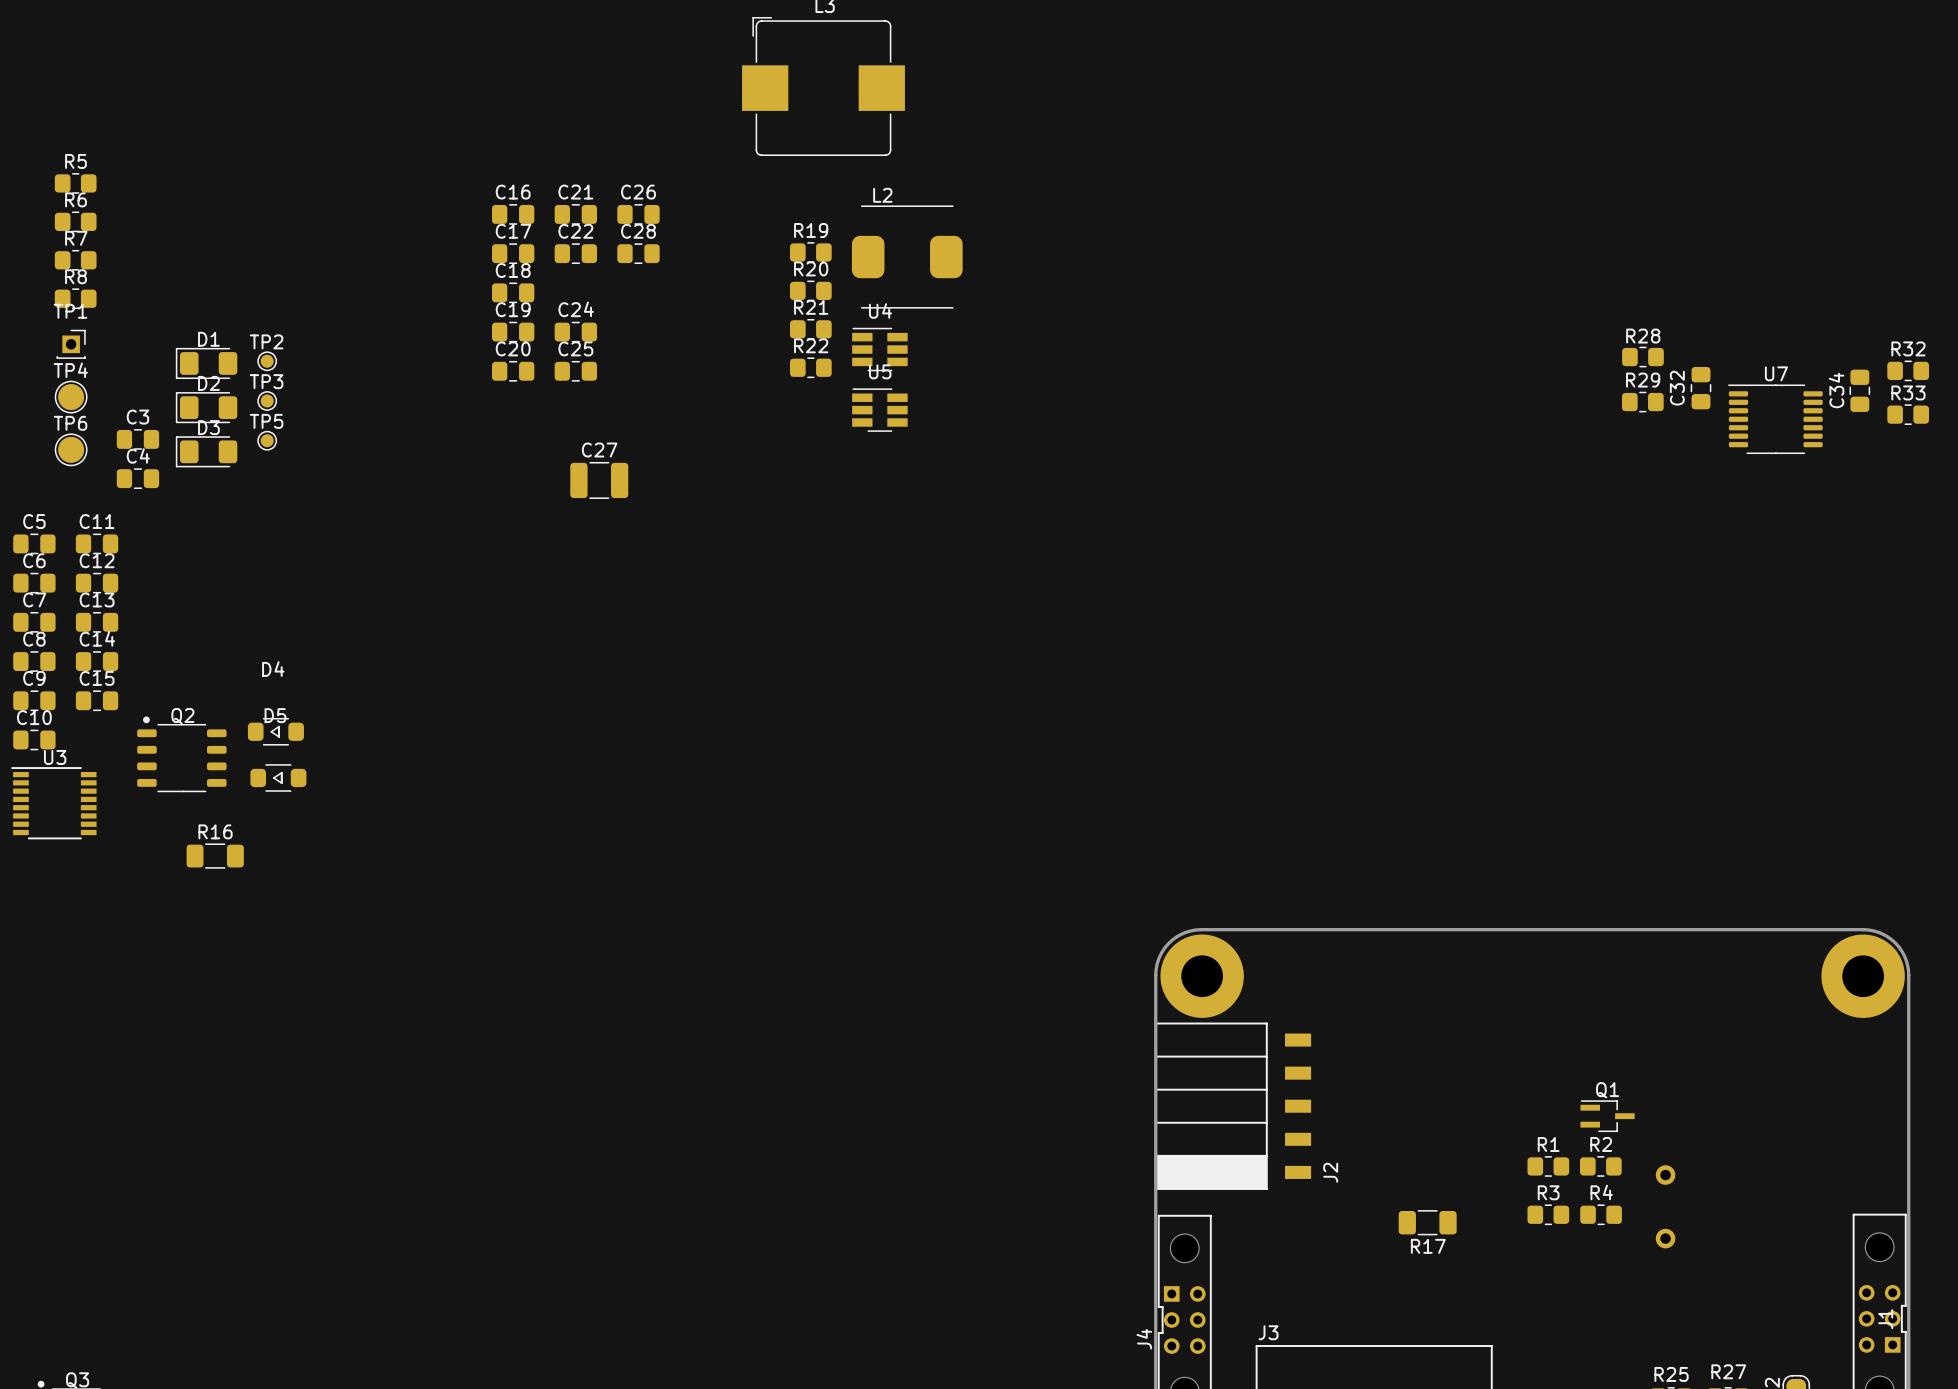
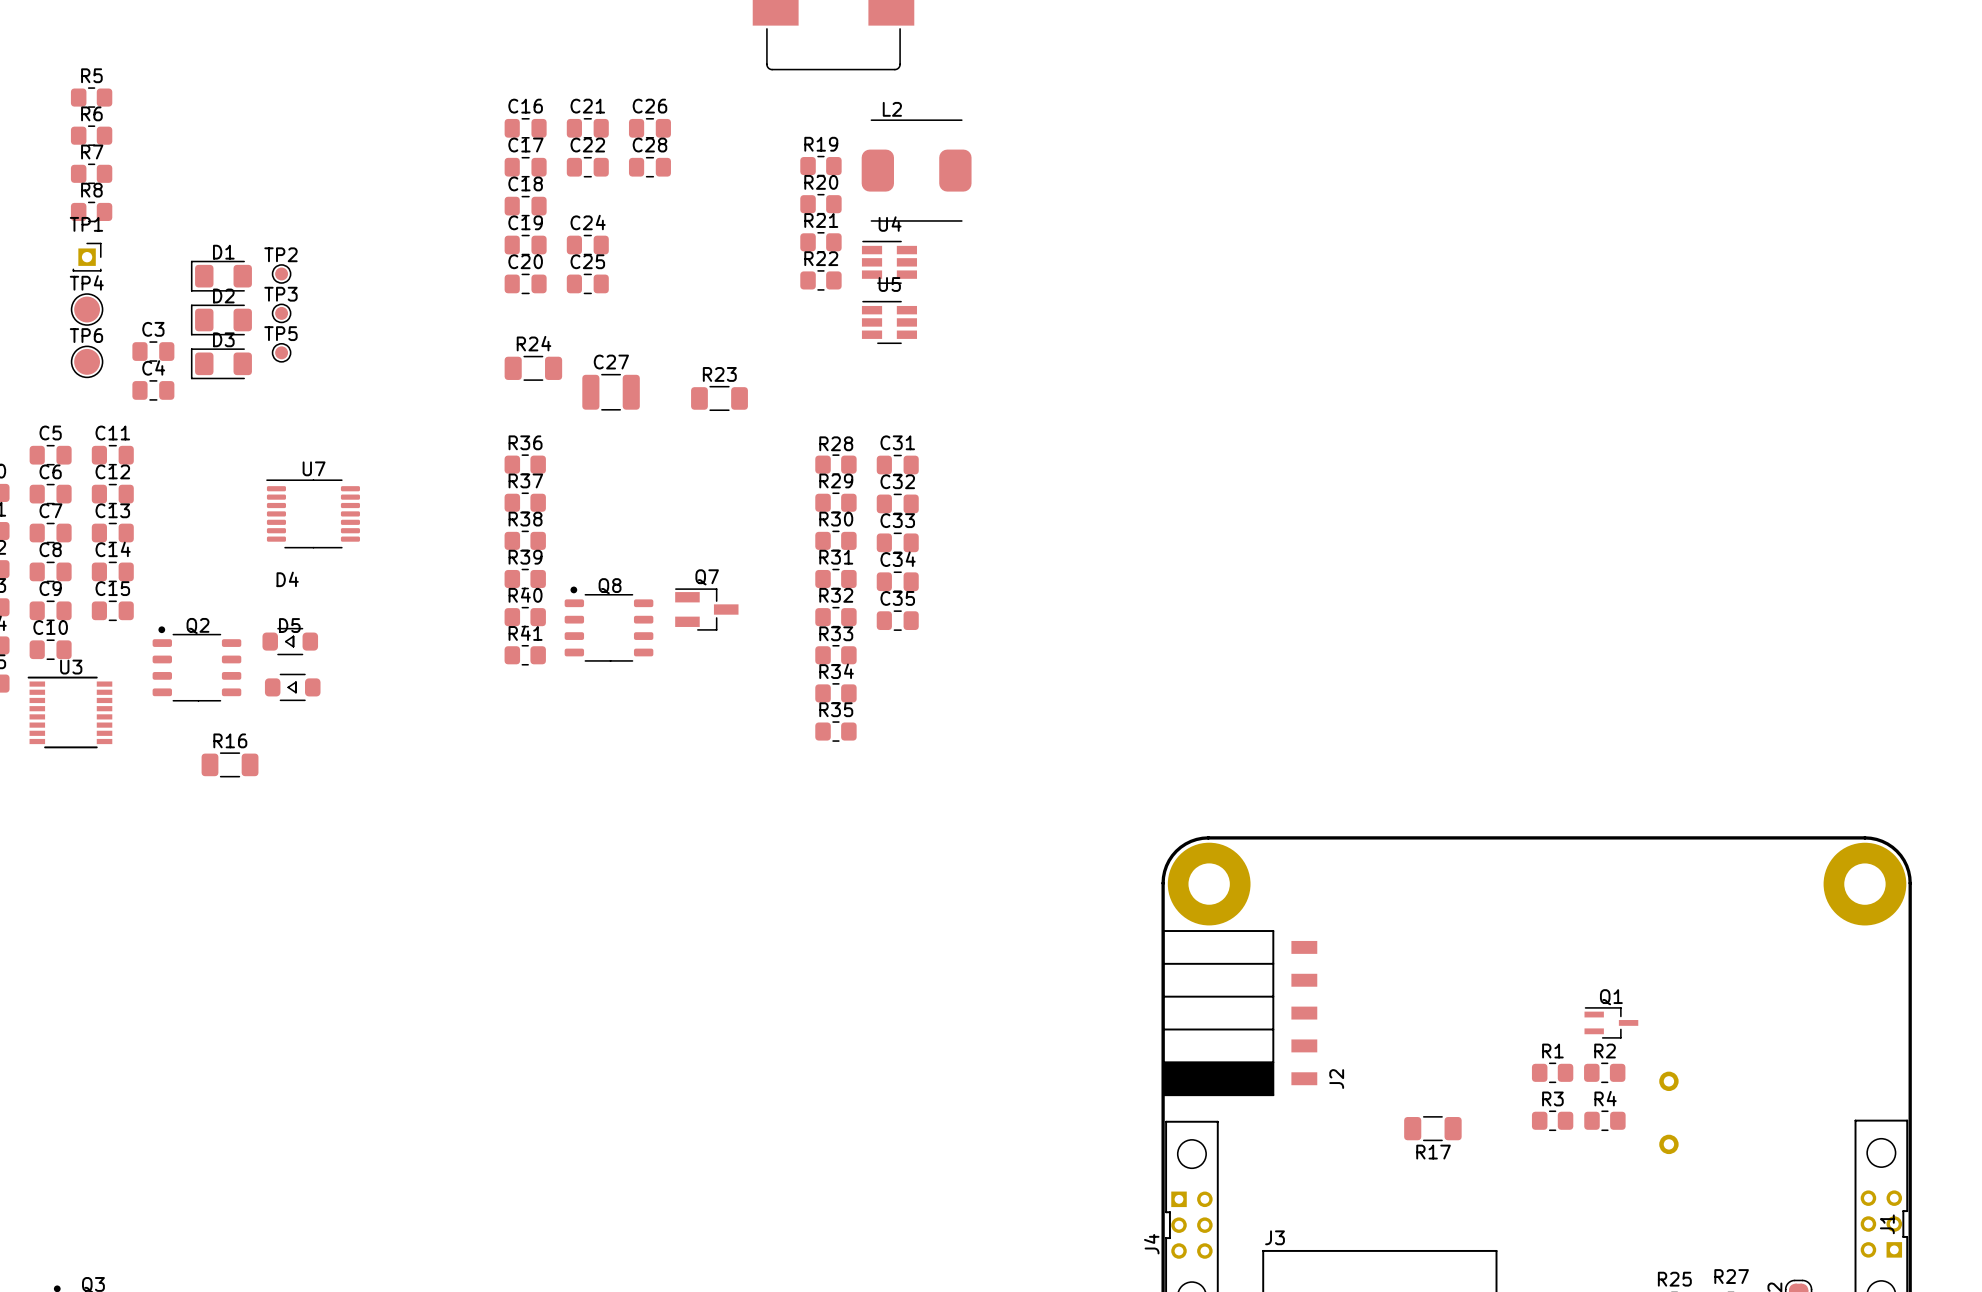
R28 position: (1642, 357) -> (835, 464)
R32 position: (1908, 370) -> (835, 617)
C32 rotation: 0° (1701, 388) -> 90° clockwise (897, 503)
C32 position: (1701, 388) -> (897, 503)
C34 rotation: 0° (1859, 390) -> 90° clockwise (897, 581)
C34 position: (1859, 390) -> (897, 581)
R29 position: (1642, 402) -> (835, 502)
R33 position: (1908, 414) -> (835, 655)
U7 position: (1775, 419) -> (313, 513)
R24: none -> (533, 368)
R23: none -> (719, 398)
R36: none -> (525, 464)
C31: none -> (897, 465)
R37: none -> (525, 502)
R38: none -> (525, 540)
R30: none -> (835, 540)
C33: none -> (897, 542)
R39: none -> (525, 579)
R31: none -> (835, 579)
Q7: none -> (706, 609)
R40: none -> (525, 617)
C35: none -> (897, 620)
Q8: none -> (609, 624)
R41: none -> (525, 655)
R34: none -> (835, 693)
R35: none -> (835, 731)

